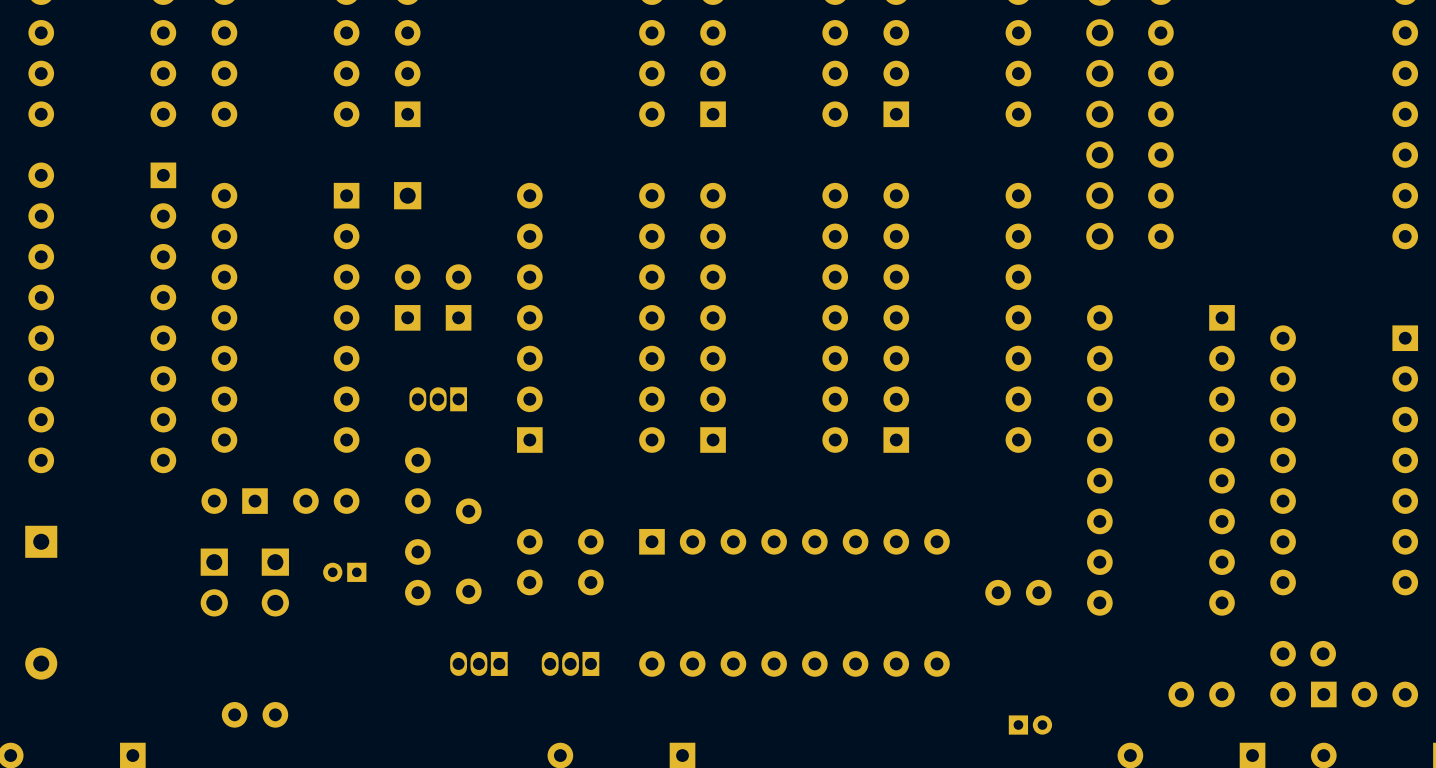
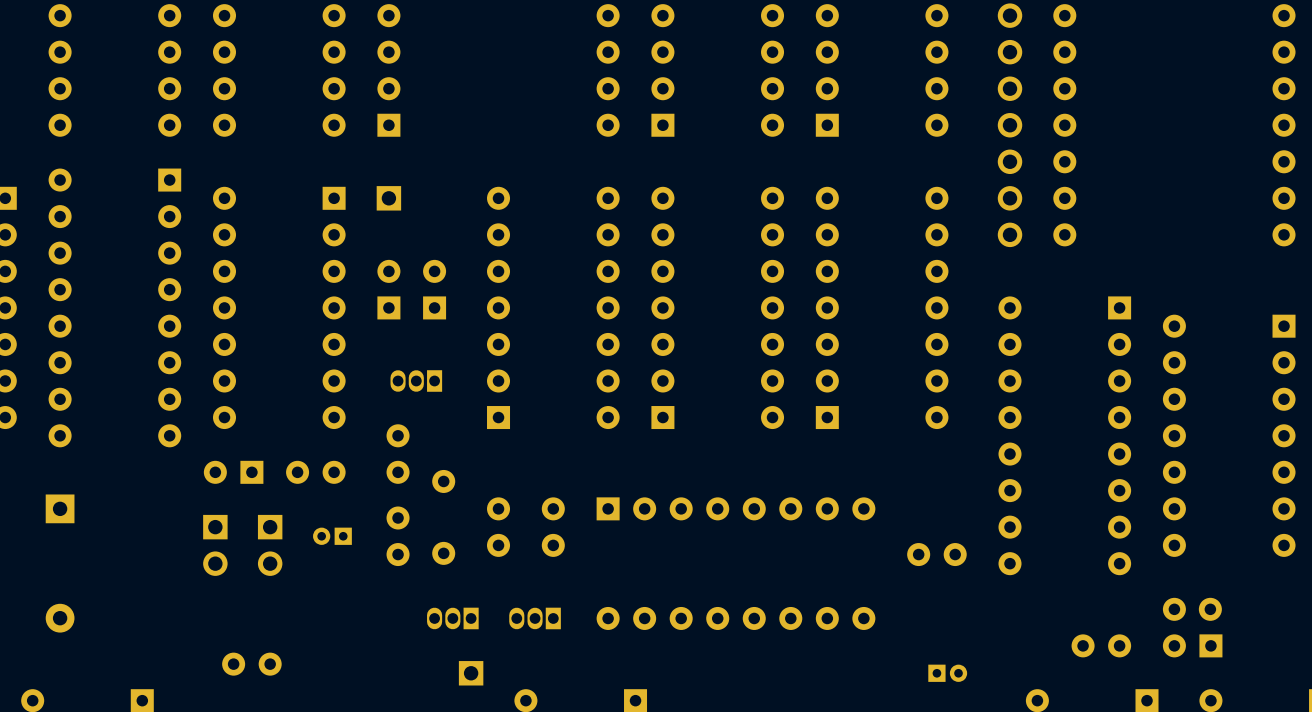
part: (1384, 694) -> none
part: none -> (471, 673)

